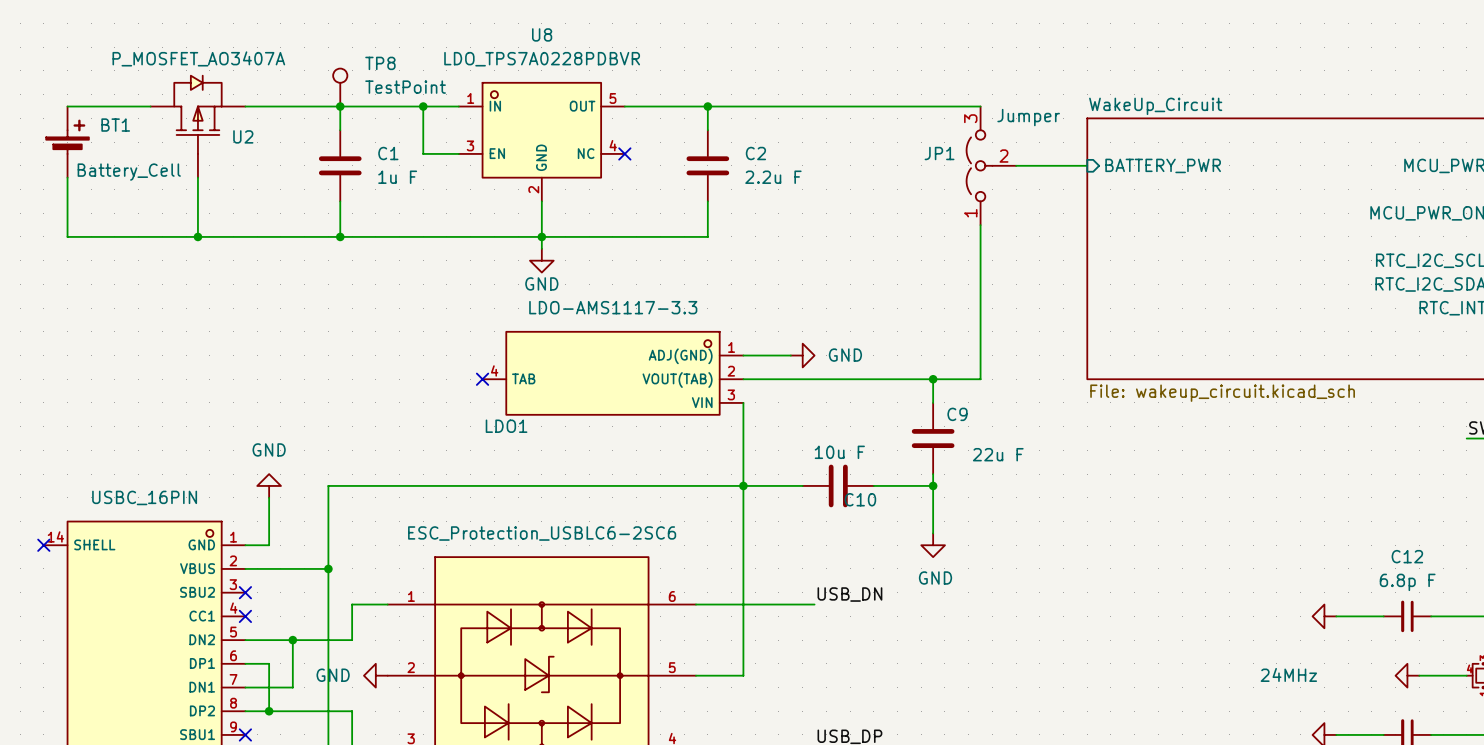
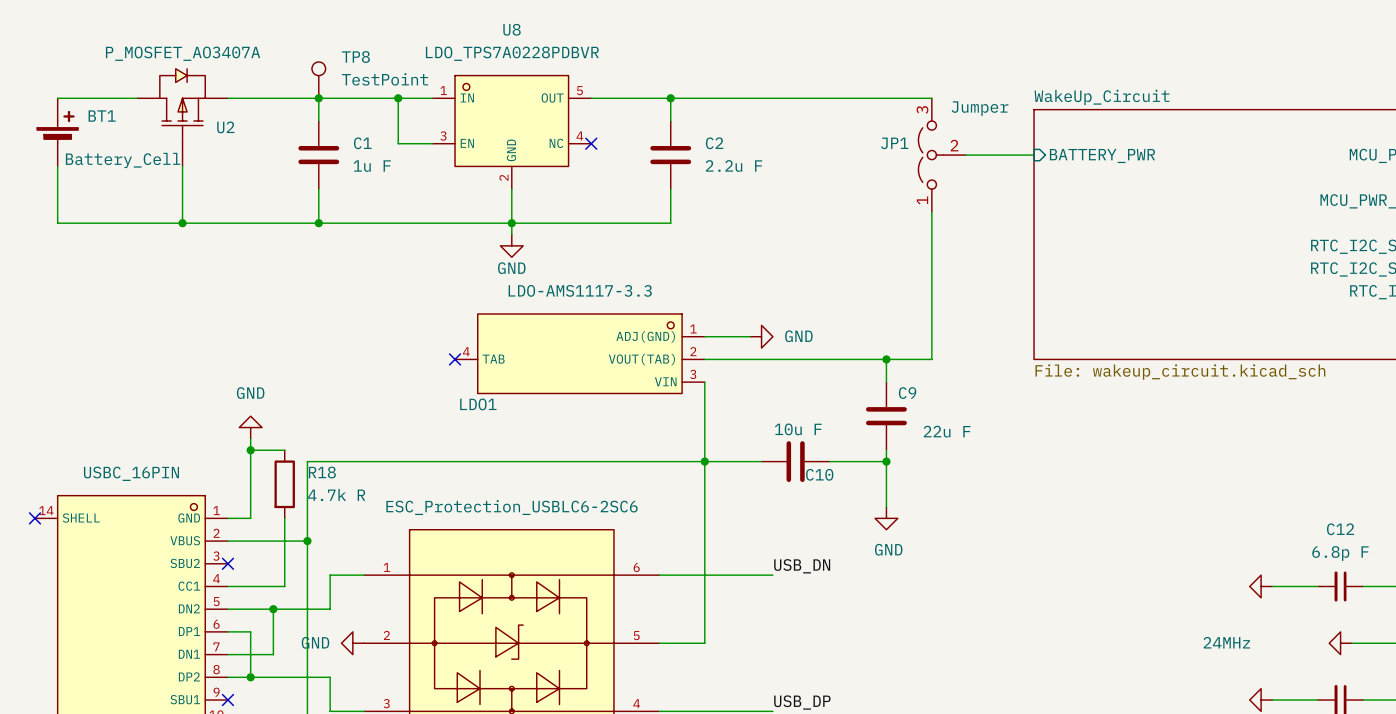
wire: none -> (250, 438) (250, 472)
wire: none -> (250, 450) (284, 450)
junction: none -> (250, 450)
power symbol position: GND (269, 485) -> GND (250, 427)
R18: none -> 4.7k R (284, 484)
wire: none -> (284, 518) (284, 586) (227, 586)
no-connect mark: (245, 616) -> none

